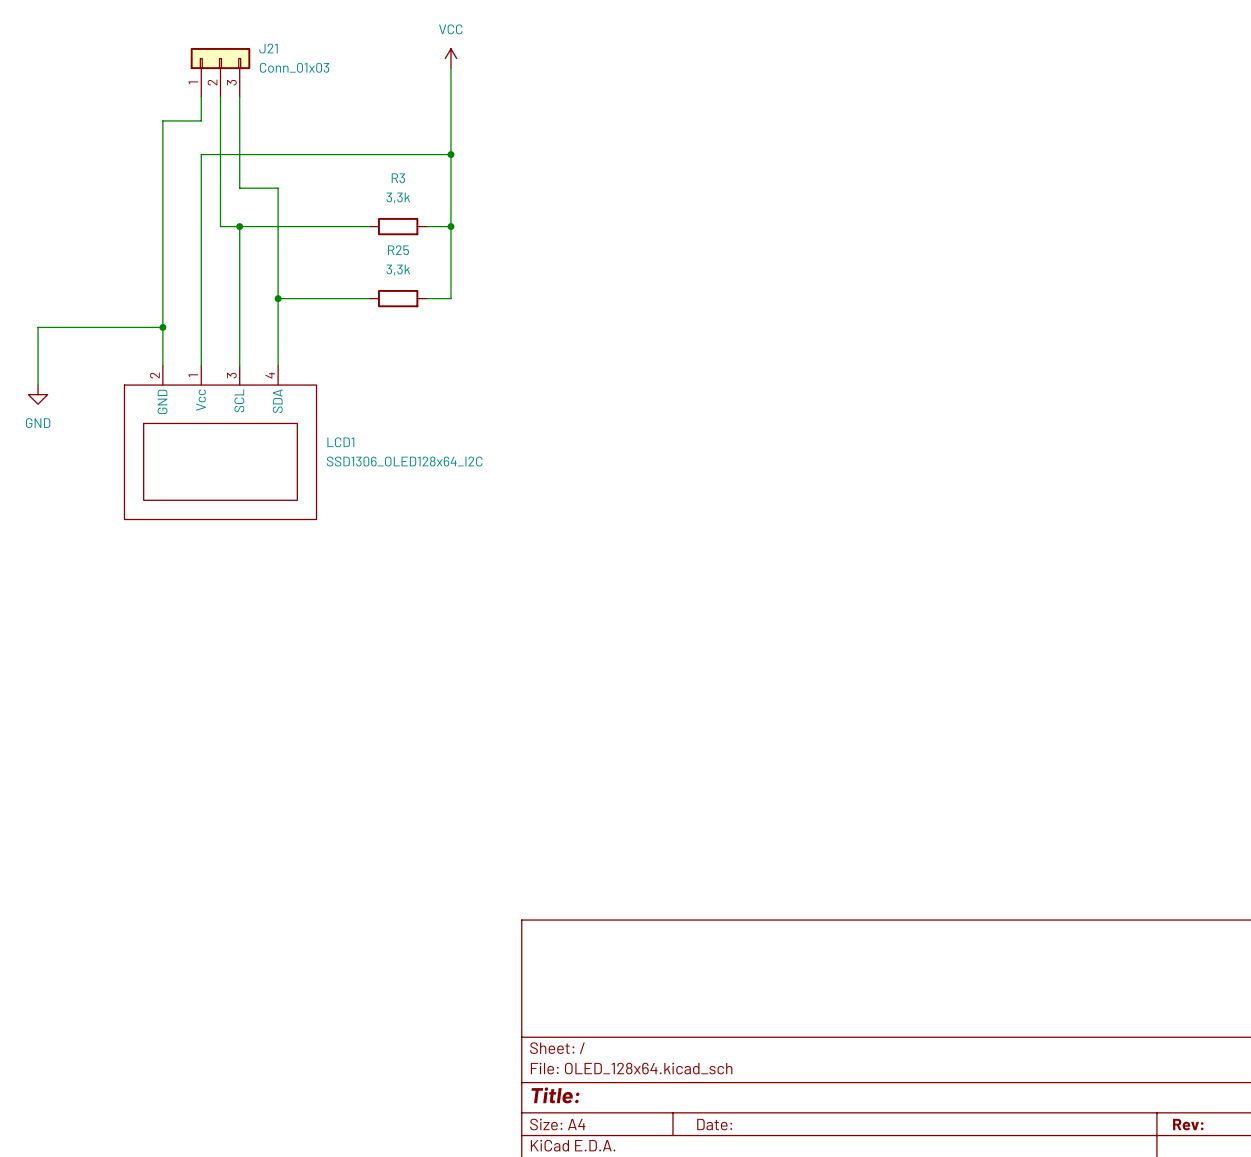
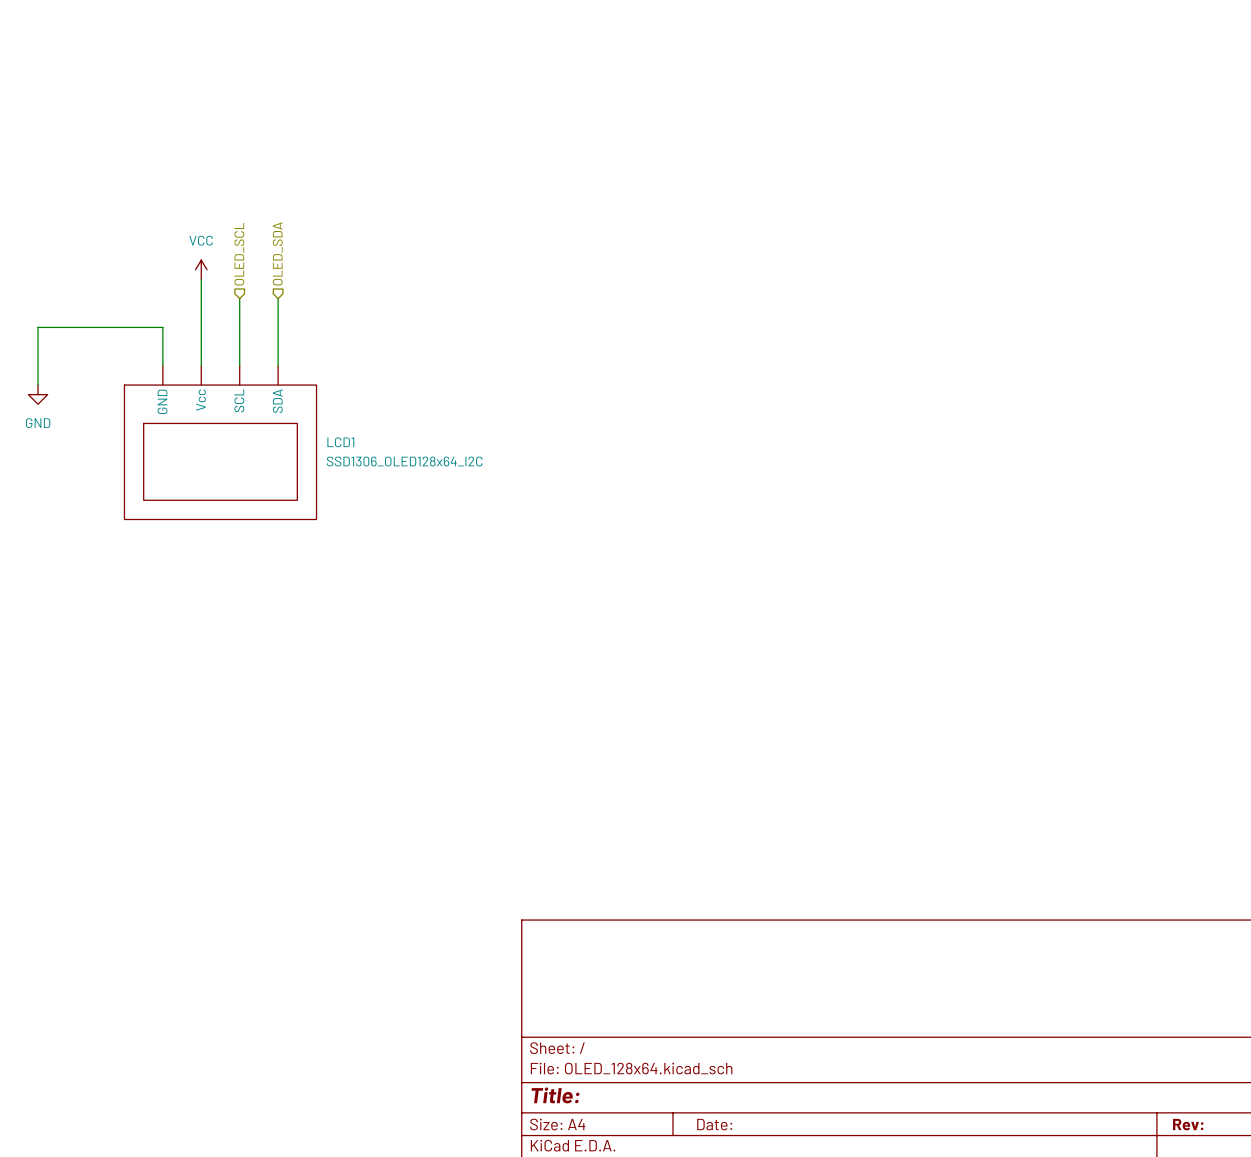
power symbol: VCC (450, 58) -> none
wire: (450, 68) (450, 298) (426, 298) -> none
J21: Conn_01x03 (220, 72) -> none
wire: (201, 96) (201, 120) (162, 120) (162, 327) -> none
wire: (220, 96) (220, 226) (369, 226) -> none
wire: (239, 96) (239, 188) (278, 188) (278, 298) (369, 298) -> none
wire: (450, 154) (201, 154) (201, 279) -> none
junction: (450, 154) -> none
wire: (239, 226) (239, 298) -> none
junction: (239, 226) -> none
R3: 3,3k (398, 226) -> none
wire: (426, 226) (450, 226) -> none
junction: (450, 226) -> none
hierarchical label: none -> OLED_SDA (277, 253)
hierarchical label: none -> OLED_SCL (239, 254)
power symbol: none -> VCC (201, 269)
junction: (278, 298) -> none
R25: 3,3k (398, 298) -> none
junction: (162, 327) -> none
LCD1 pin number: 2 (154, 375) -> none
LCD1 pin number: 1 (193, 375) -> none
LCD1 pin number: 3 (231, 375) -> none
LCD1 pin number: 4 (270, 375) -> none

